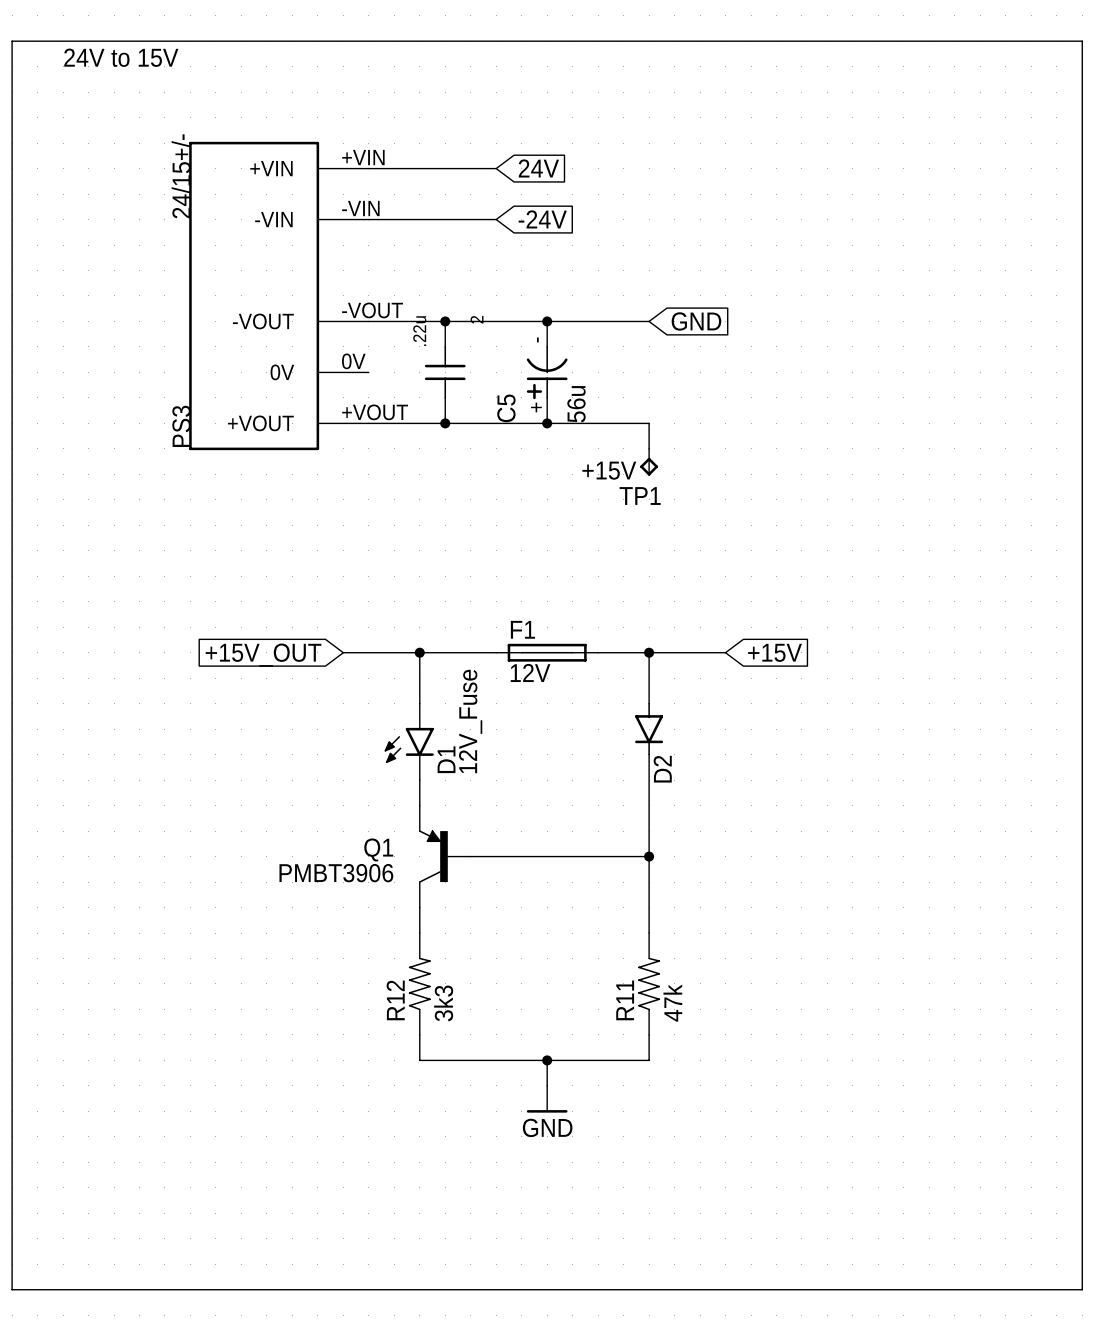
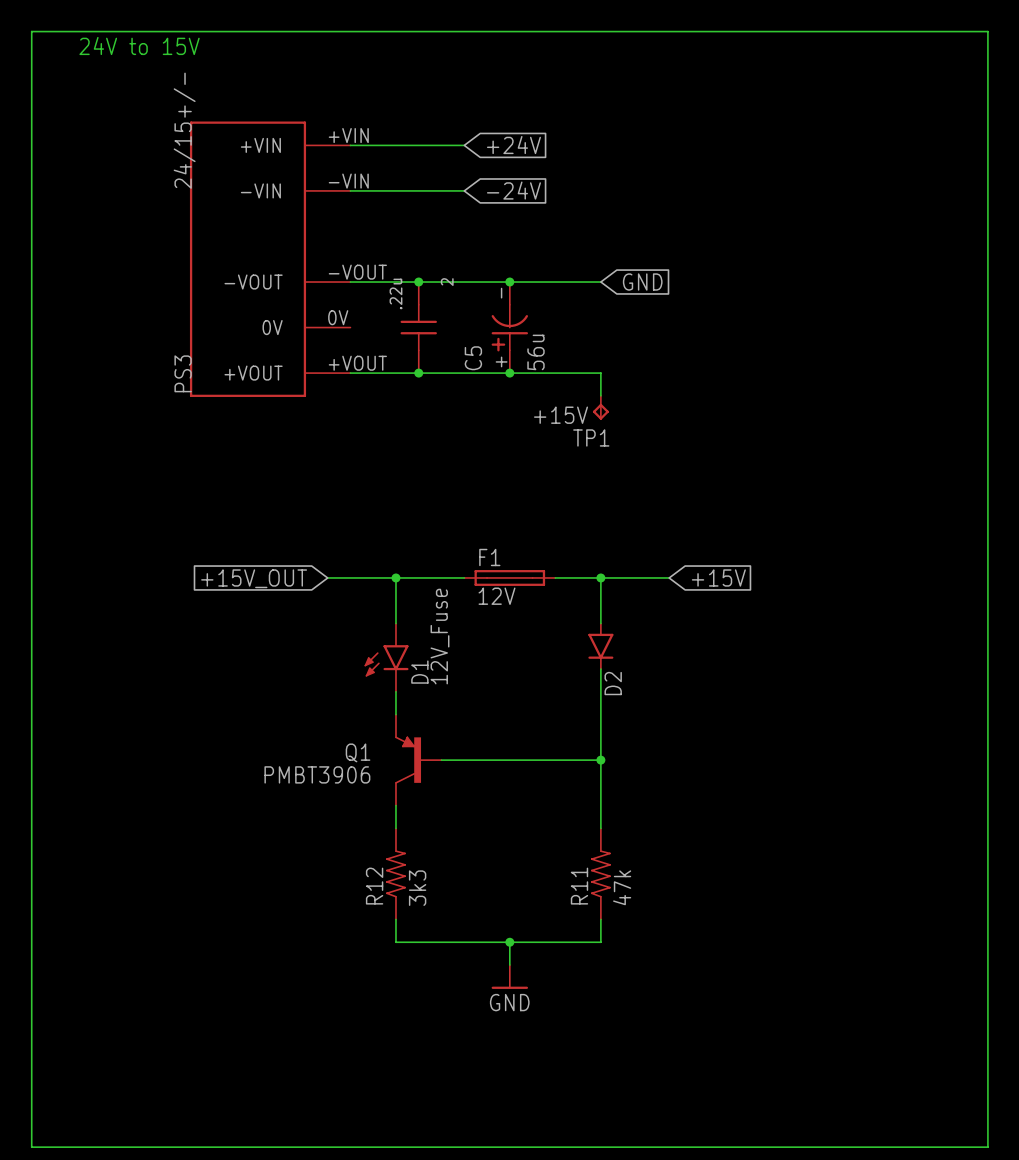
global label: 24V (538, 168) -> +24V (513, 145)

